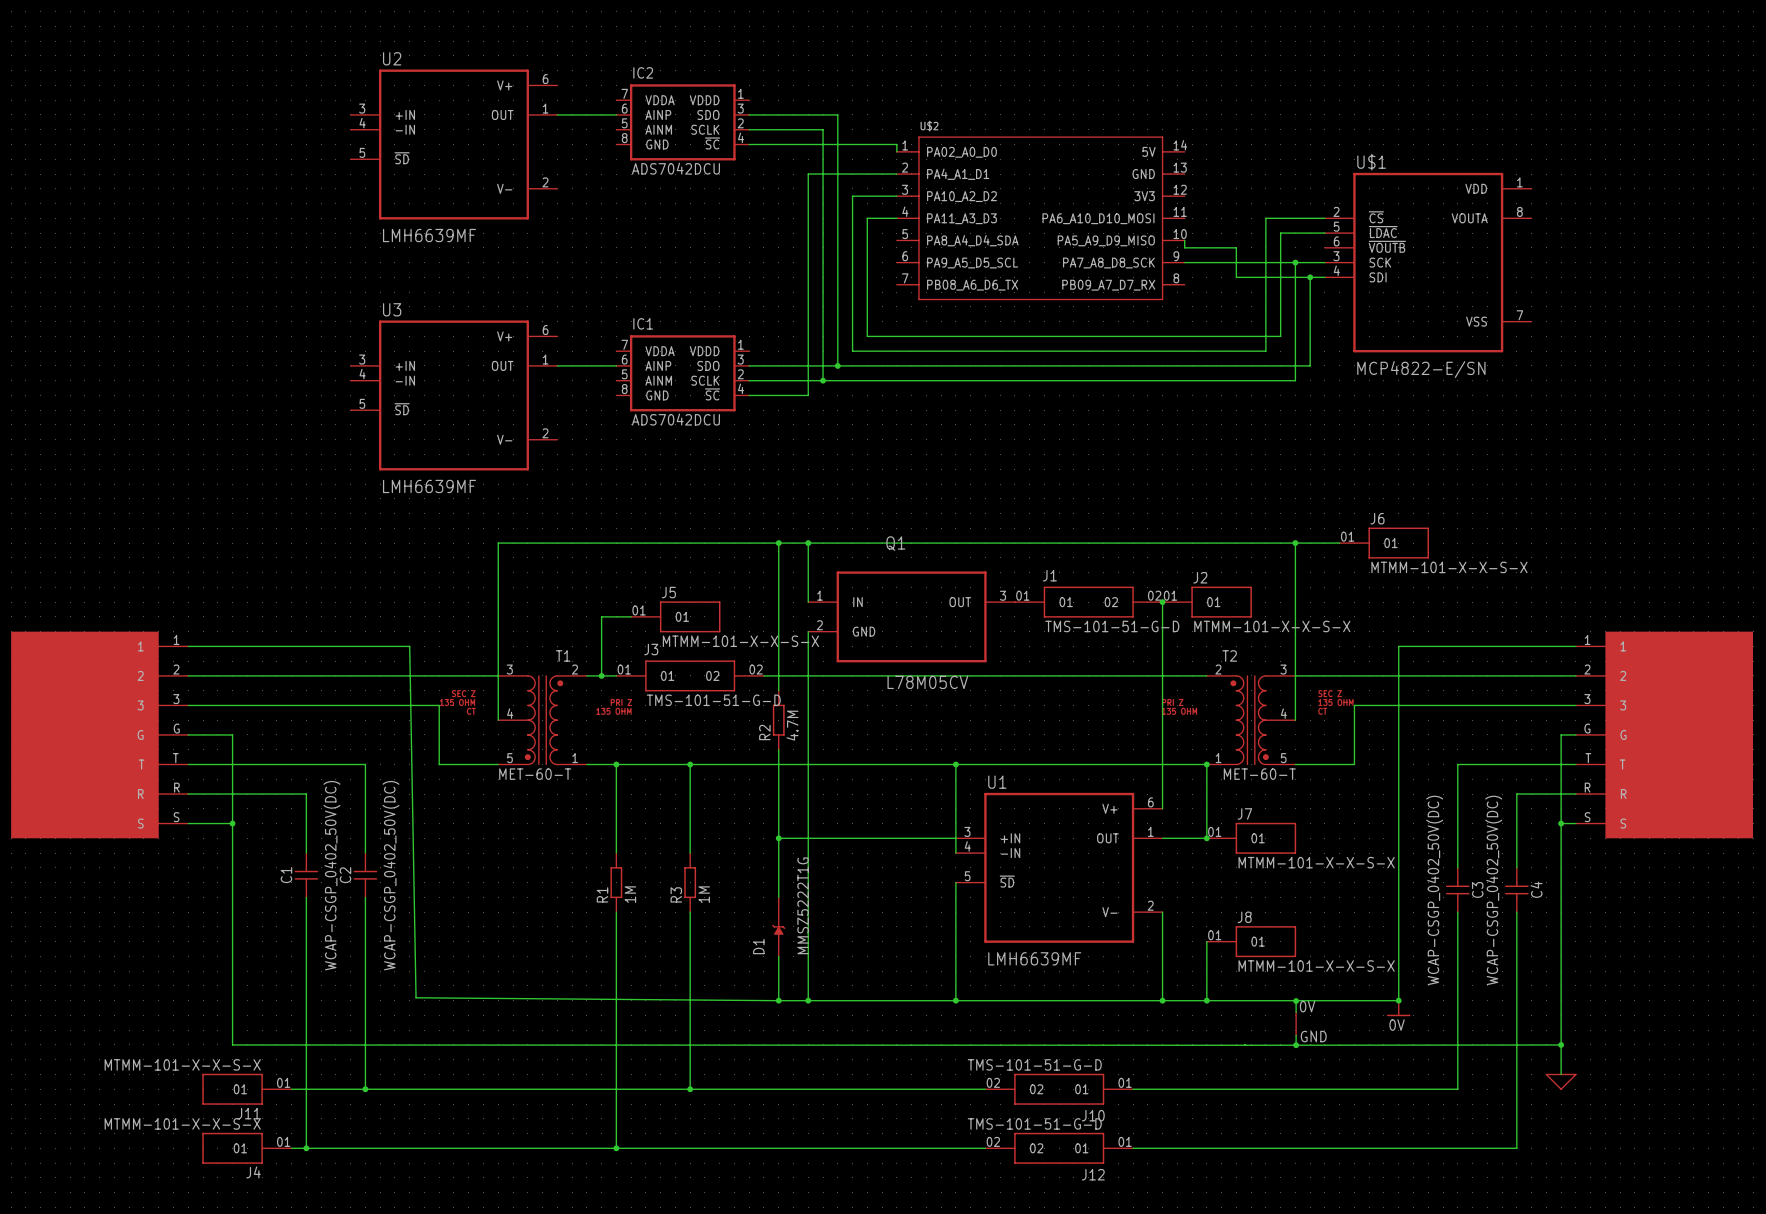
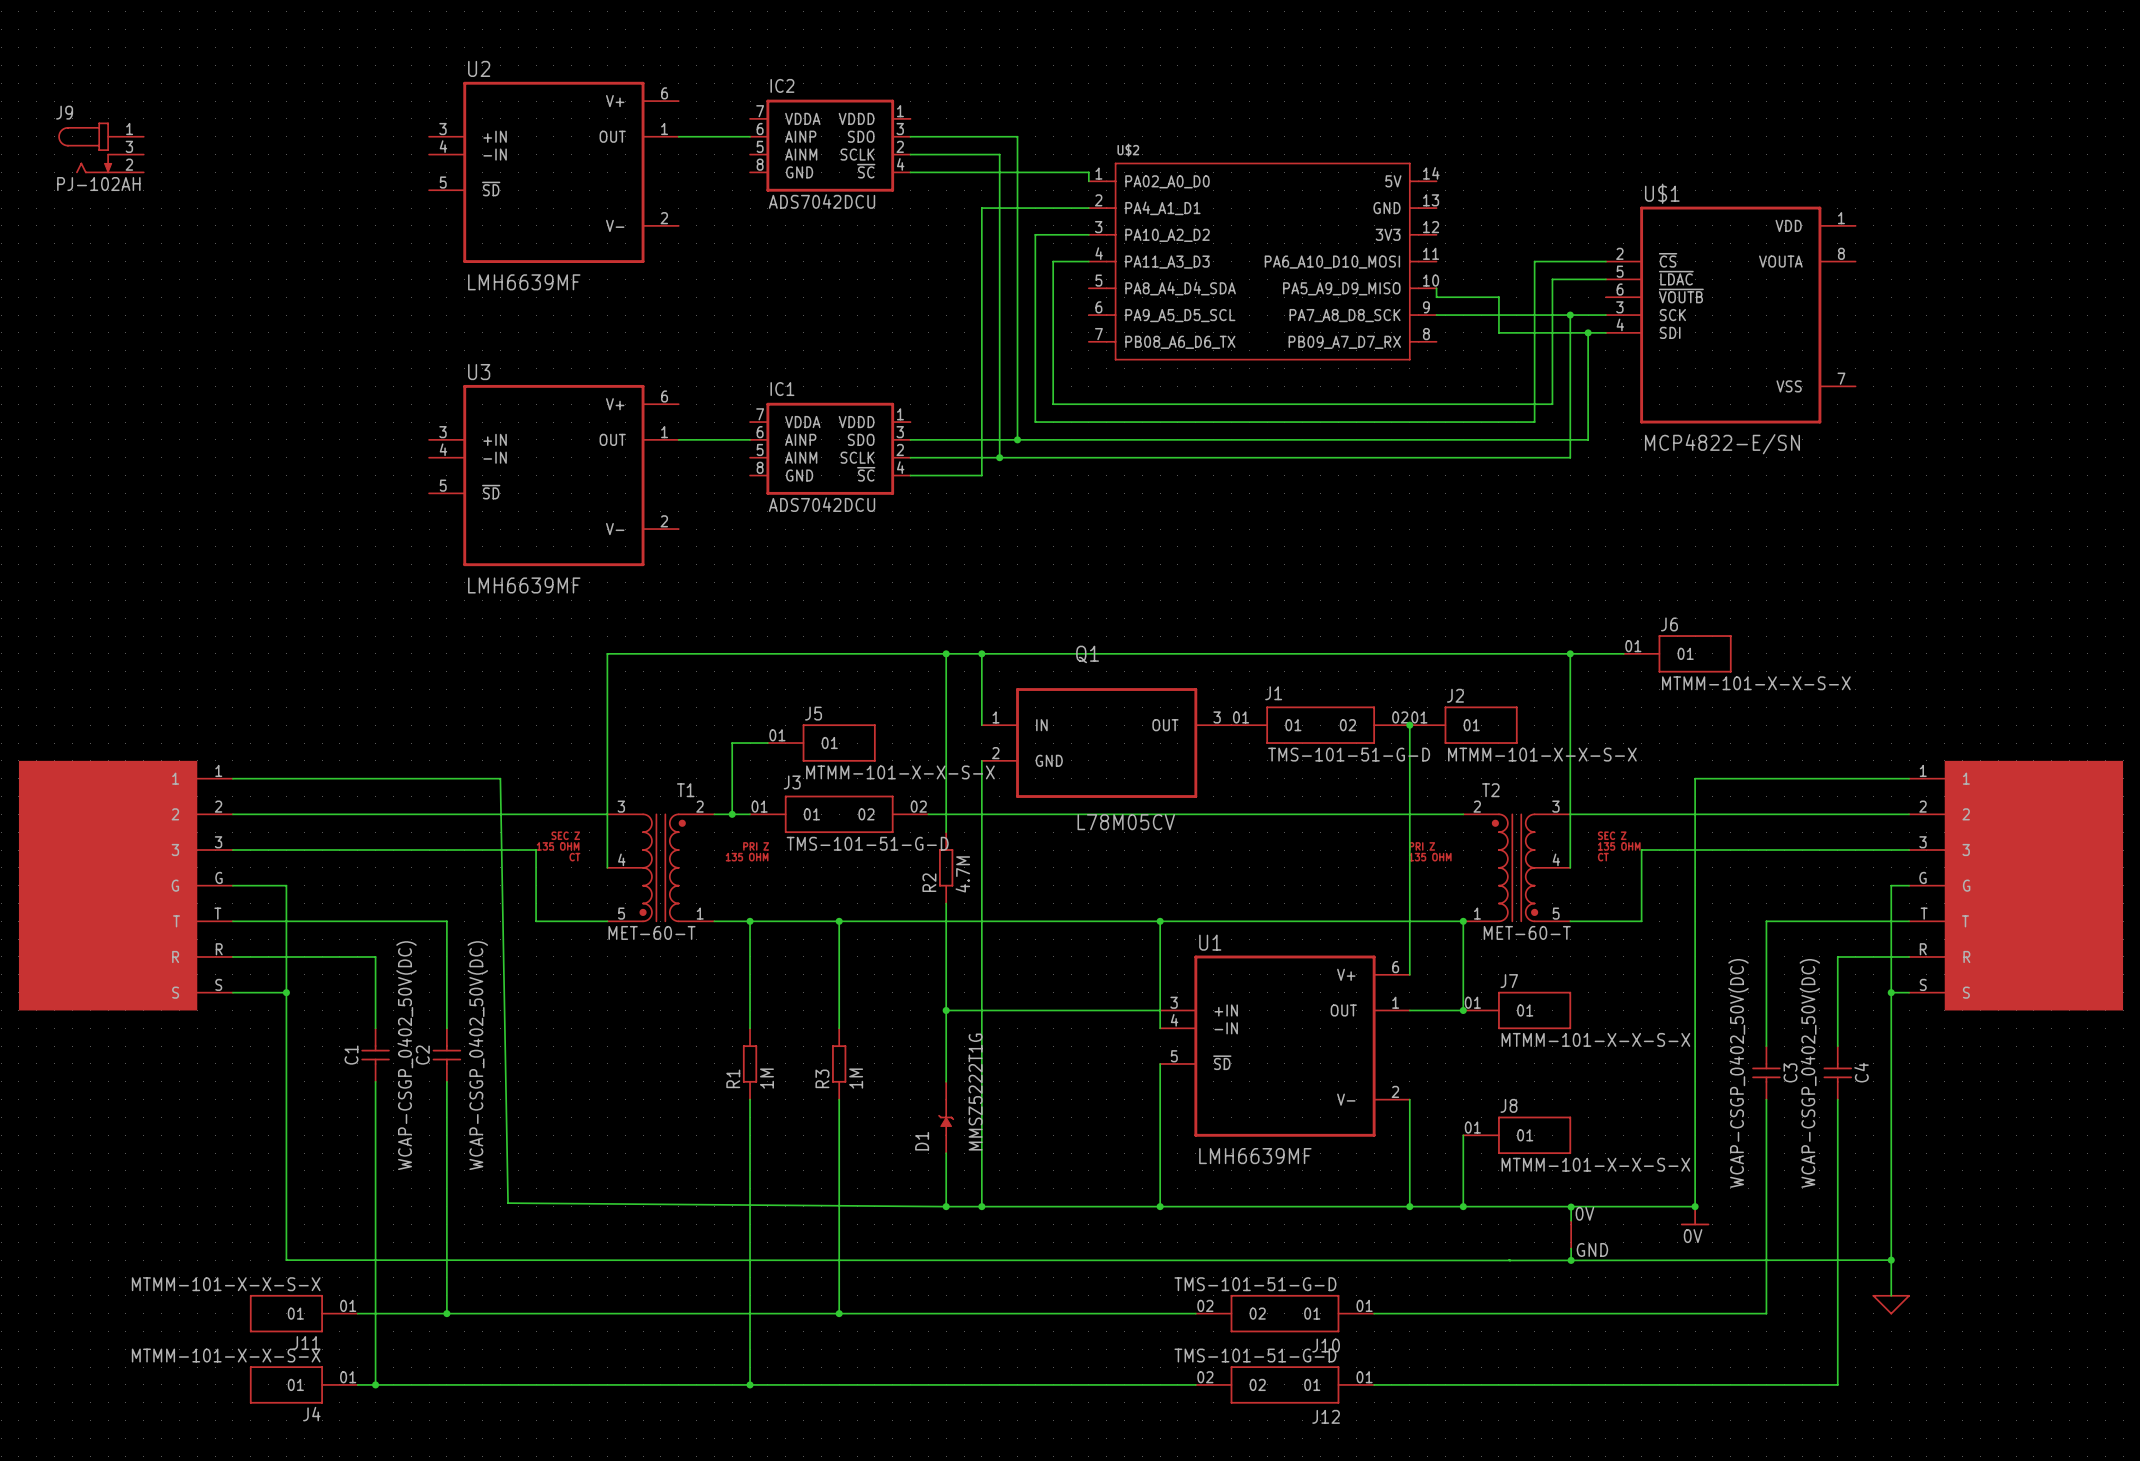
J9: none -> PJ-102AH (101, 147)

